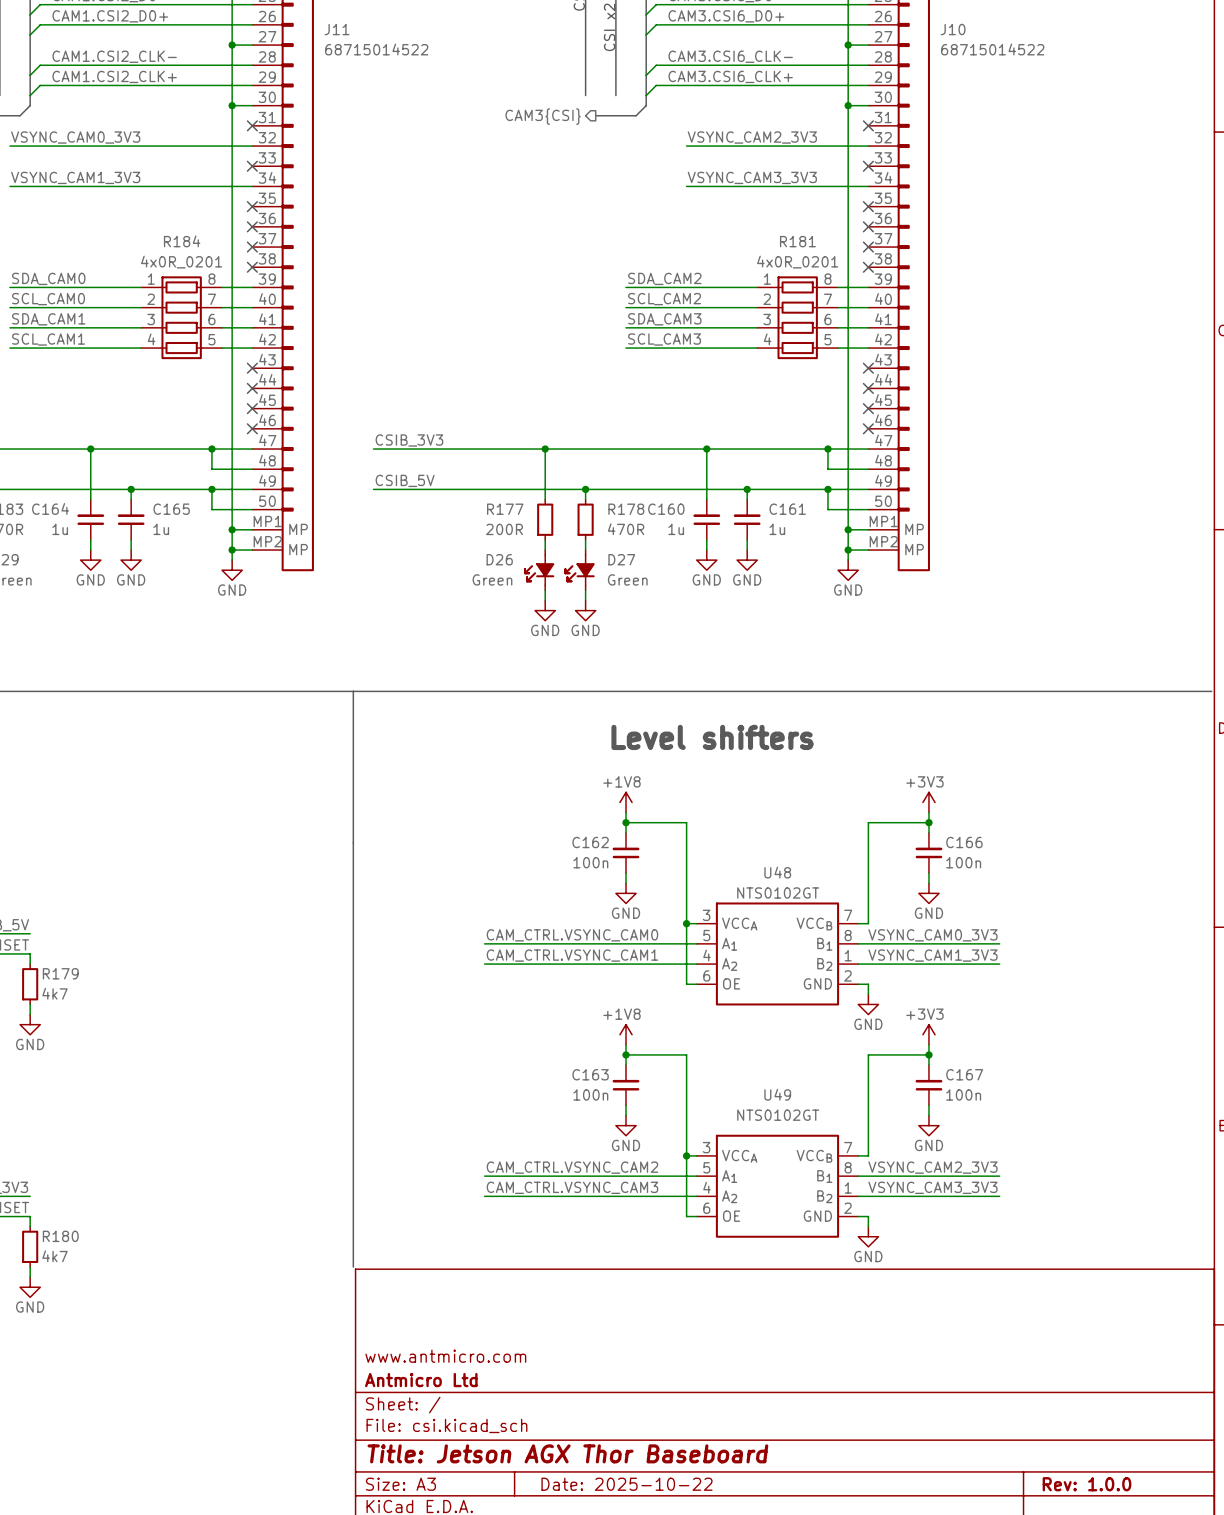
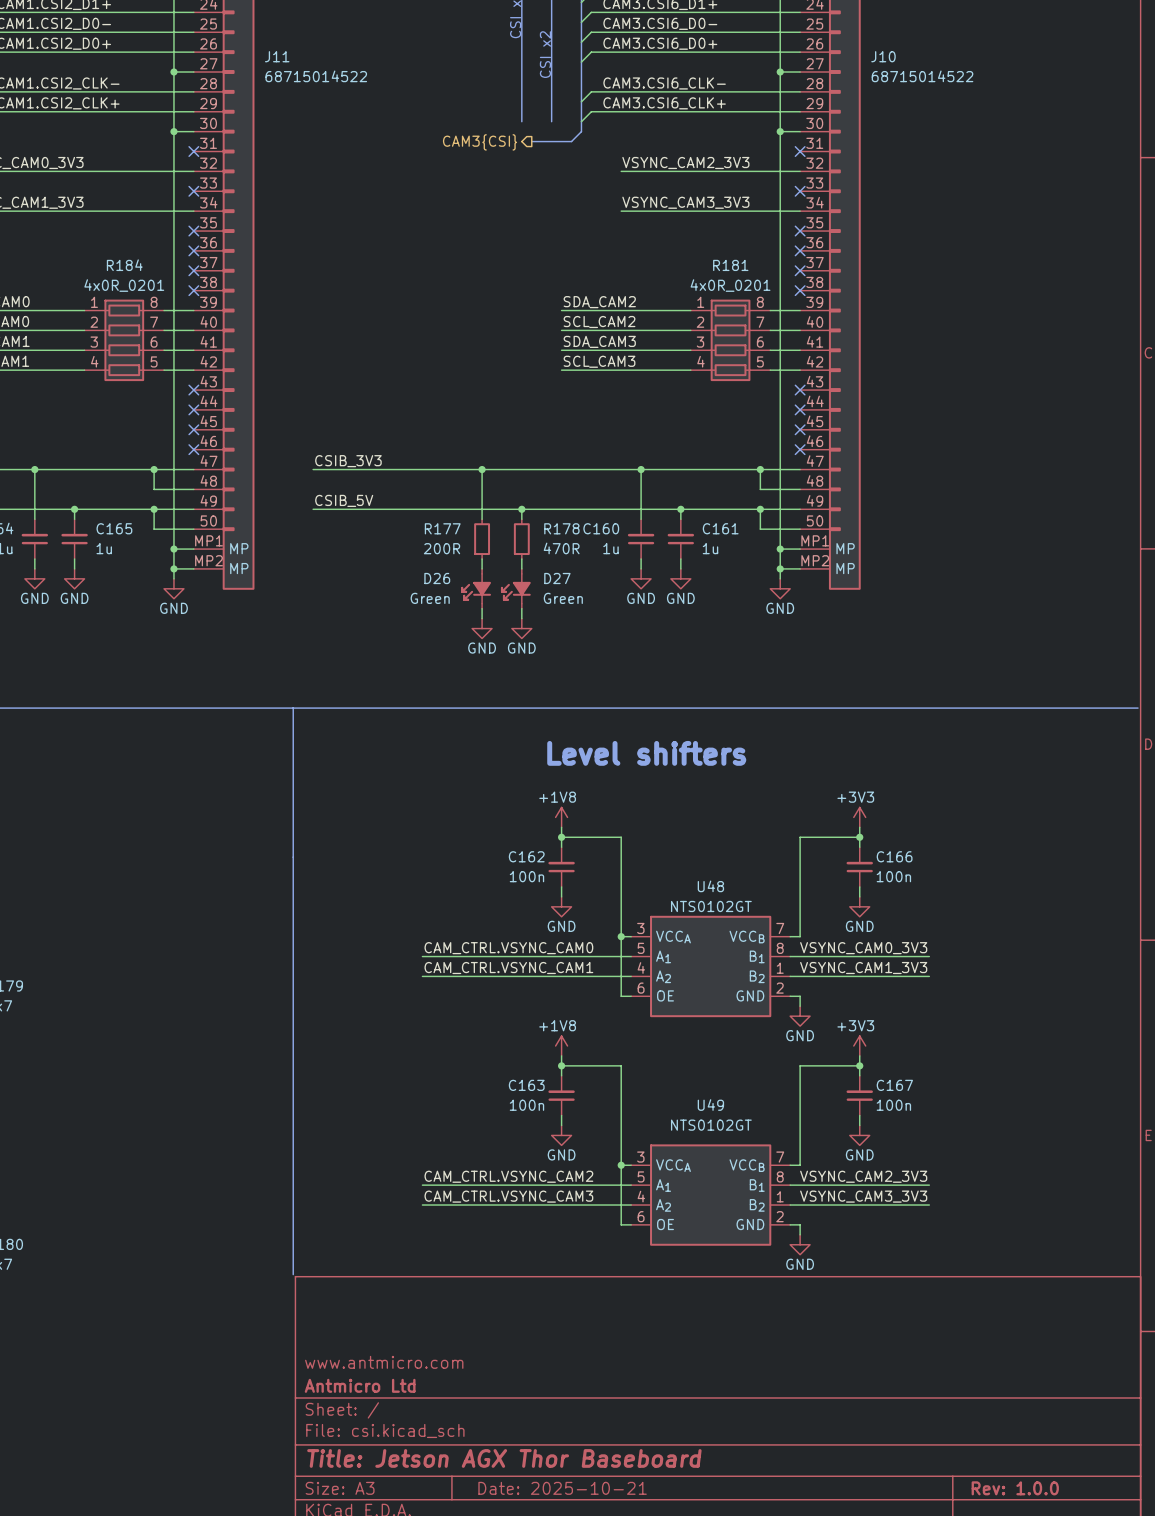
title block: Date: 2025-10-22 (627, 1484) -> Date: 2025-10-21 (562, 1488)

